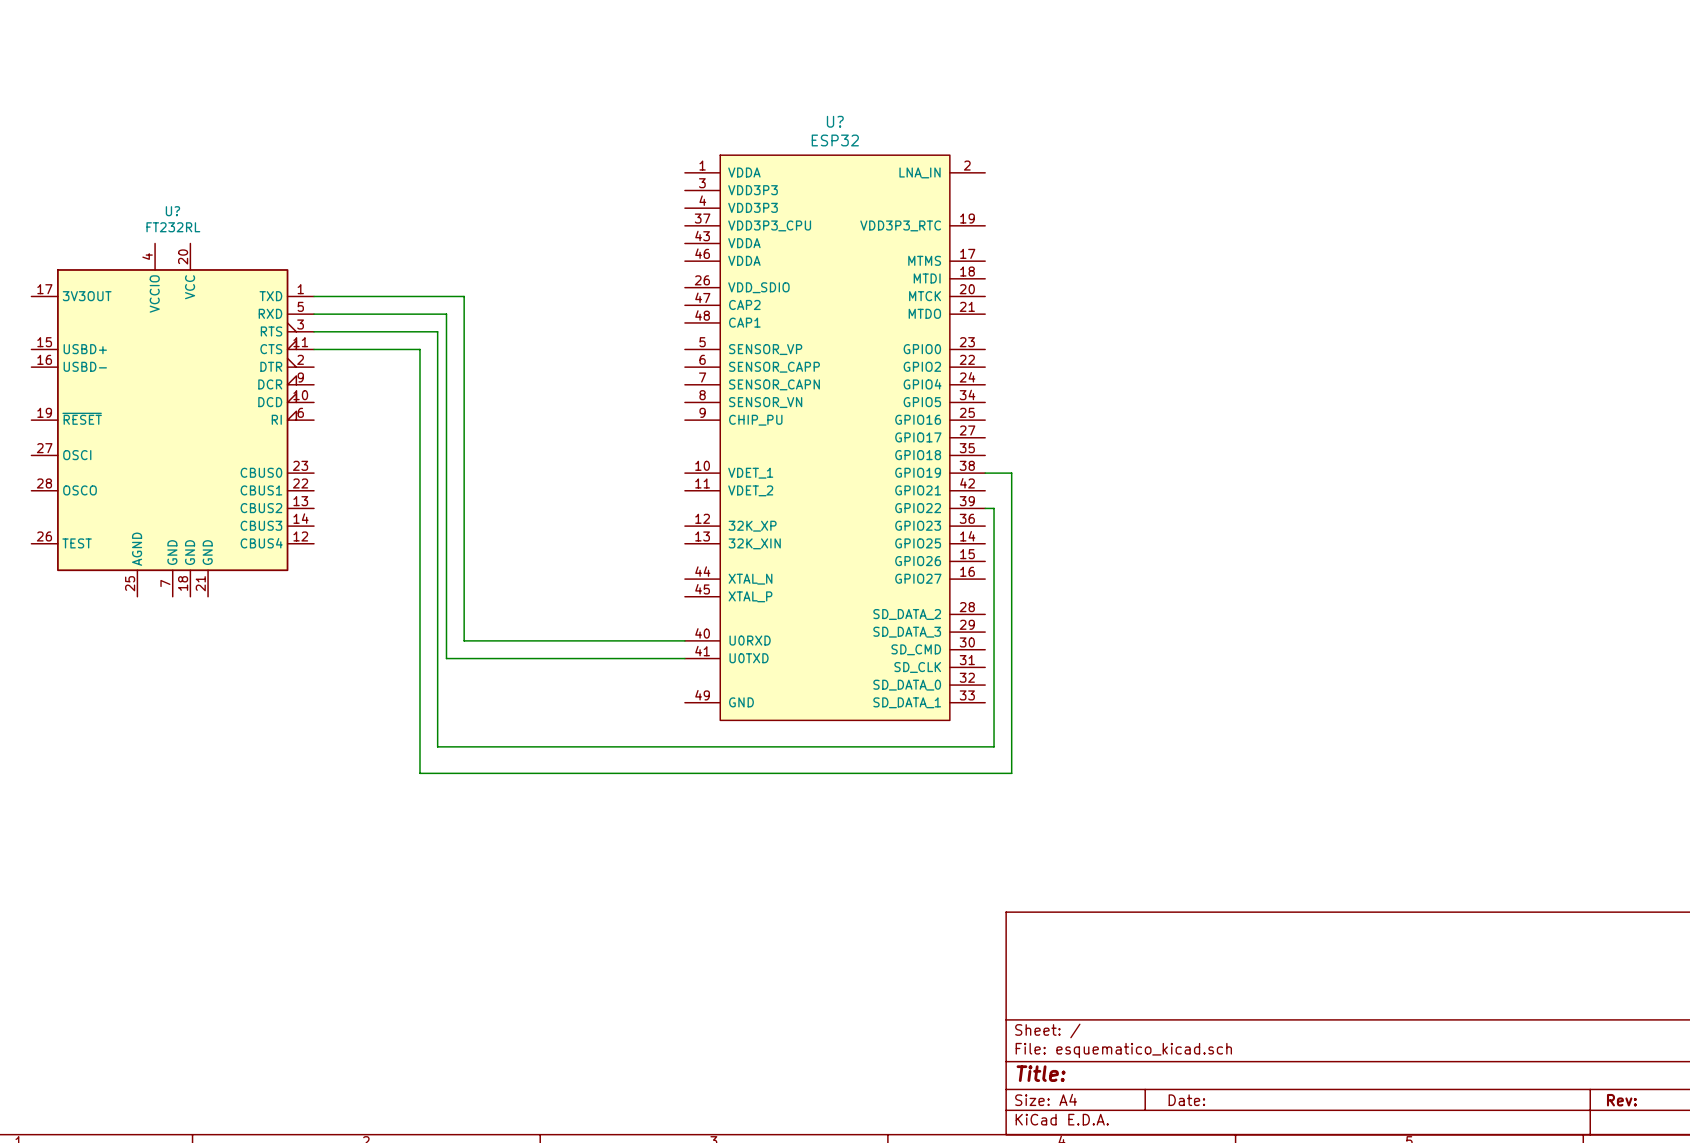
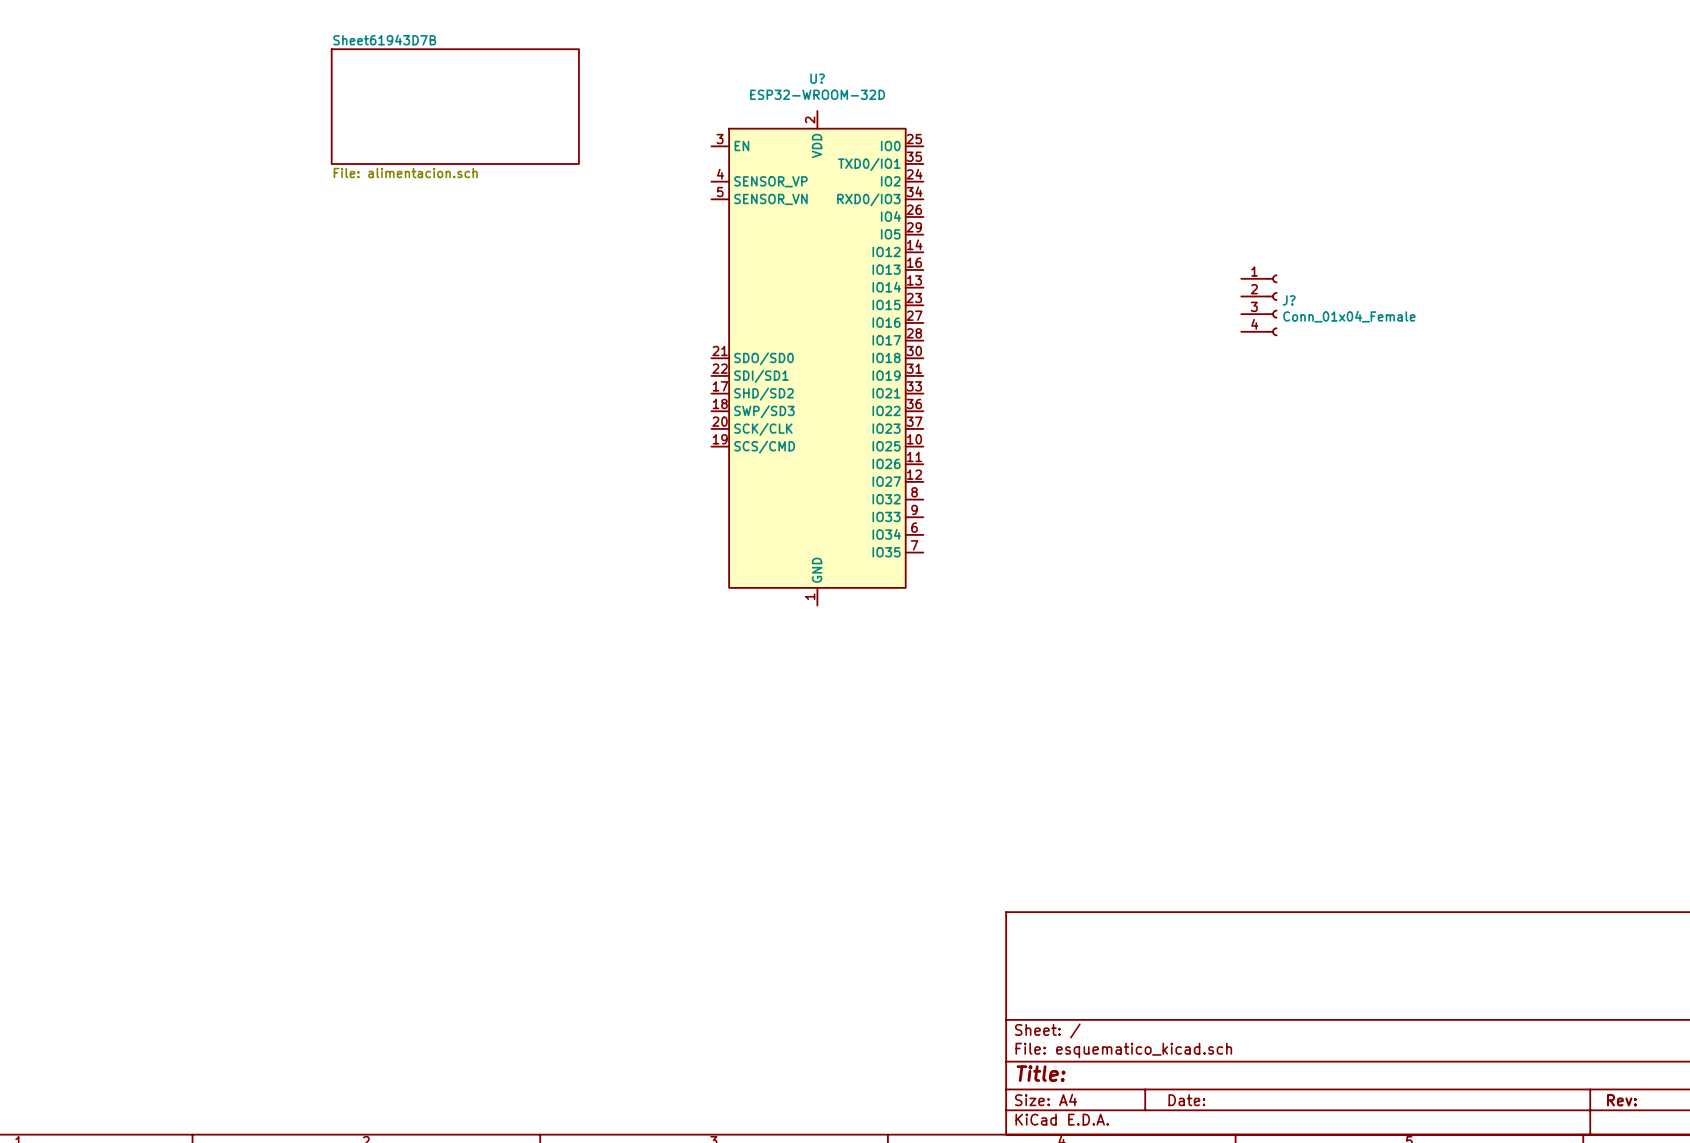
sheet Sheet61943D7B: none -> File: alimentacion.sch (455, 106)
wire: (314, 296) (464, 296) (464, 640) (684, 640) -> none
J?: none -> Conn_01x04_Female (1259, 305)
wire: (314, 314) (446, 314) (446, 658) (684, 658) -> none
wire: (314, 331) (437, 331) (437, 746) (994, 746) (994, 508) (985, 508) -> none
wire: (314, 349) (419, 349) (419, 773) (1011, 773) (1011, 473) (985, 473) -> none
U?: none -> ESP32-WROOM-32D (817, 358)
U?: FT232RL (172, 420) -> none
U?: ESP32 (835, 437) -> none

